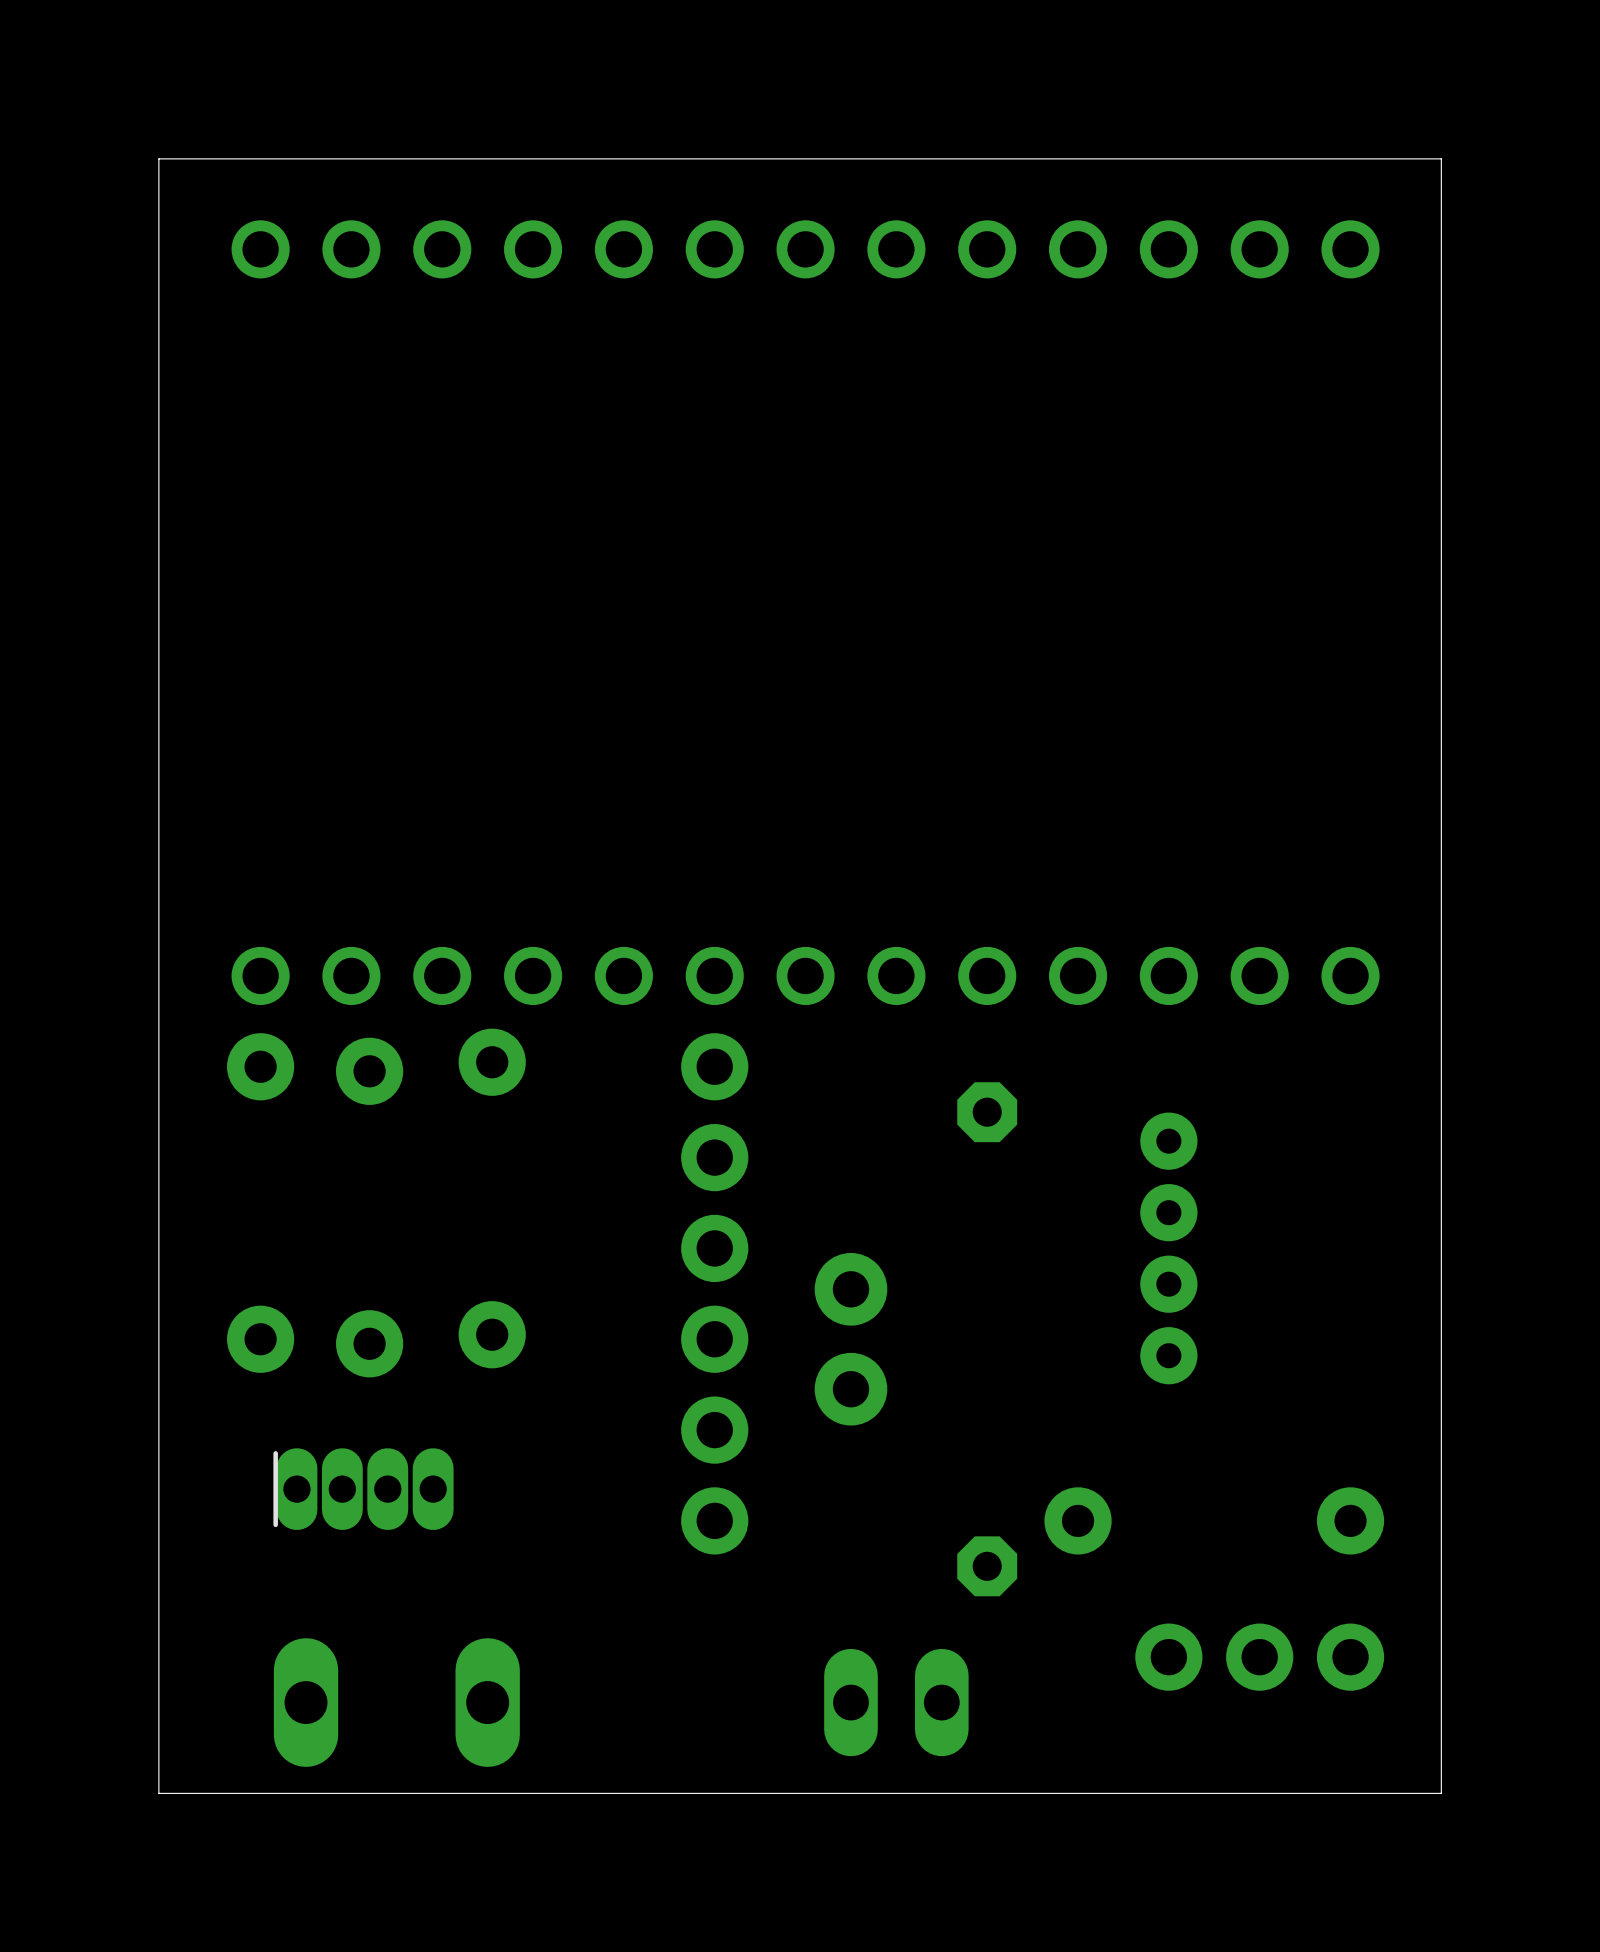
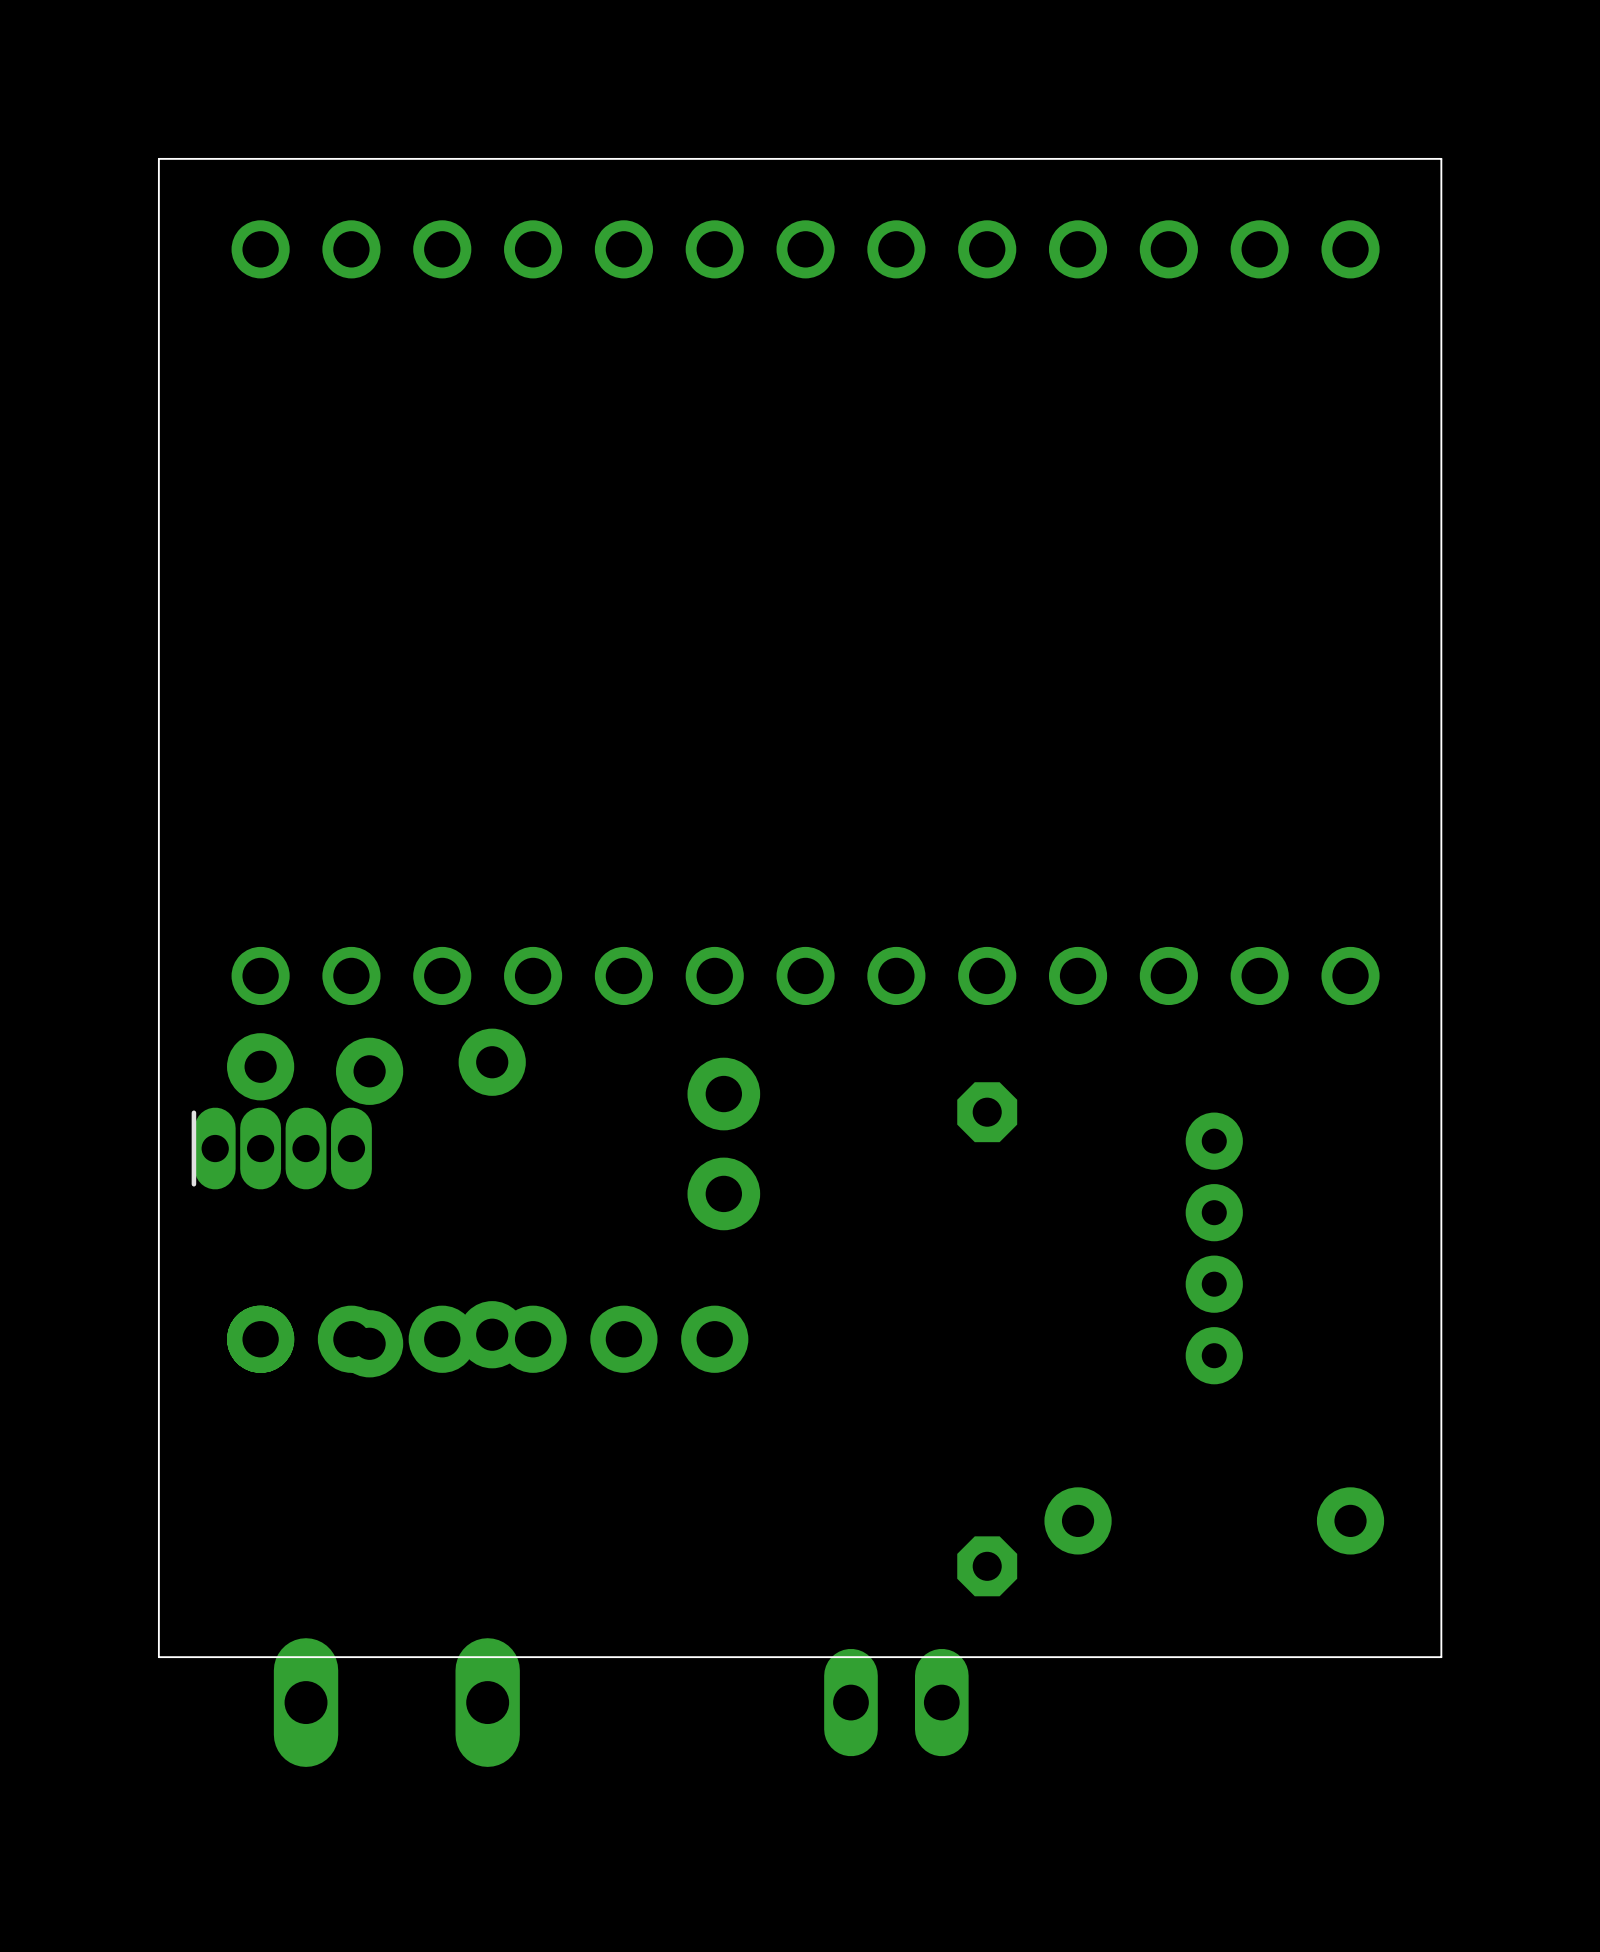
part position: (1168, 1248) -> (1214, 1248)
part rotation: 0° (714, 1293) -> 90° clockwise (487, 1339)
part position: (850, 1339) -> (723, 1143)
part position: (363, 1489) -> (281, 1148)
part: (1259, 1657) -> none
board edge: (1441, 1657) (1441, 1793) (158, 1793) (158, 1657) -> (1441, 1657) (158, 1657)

